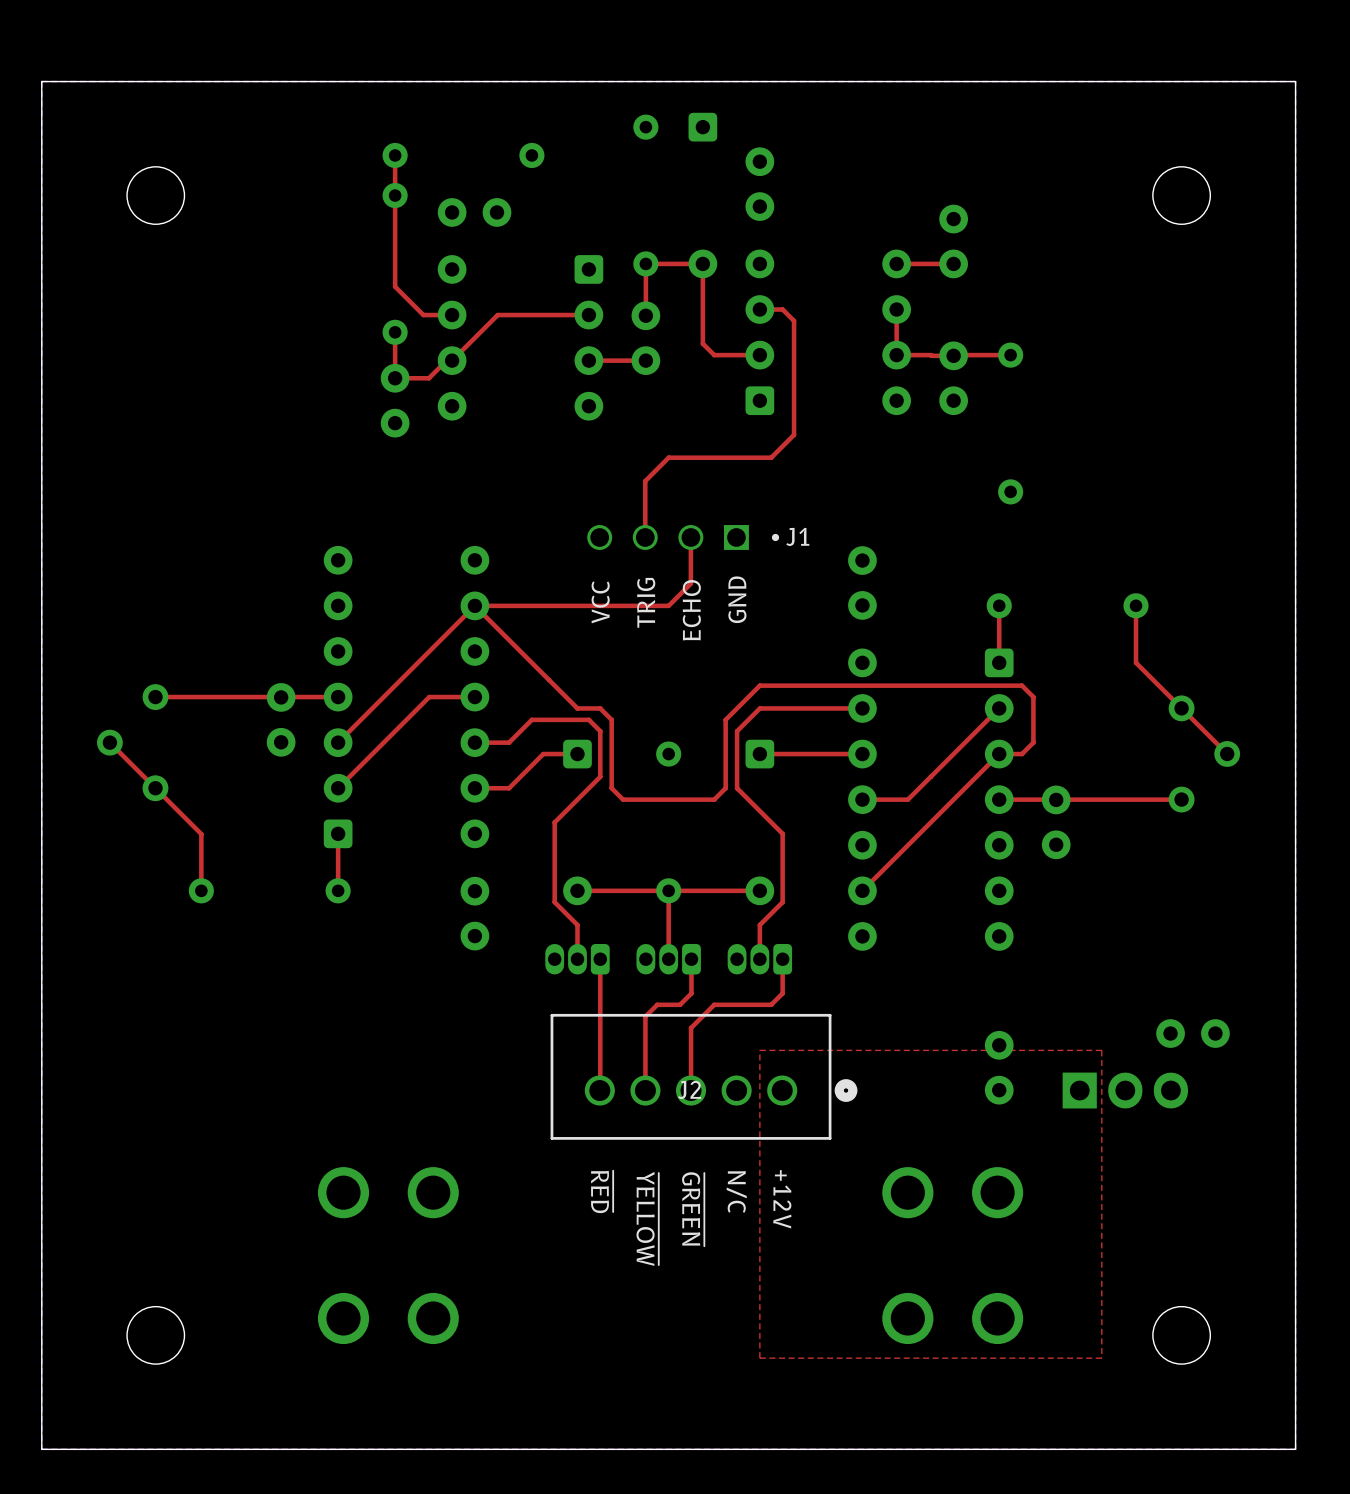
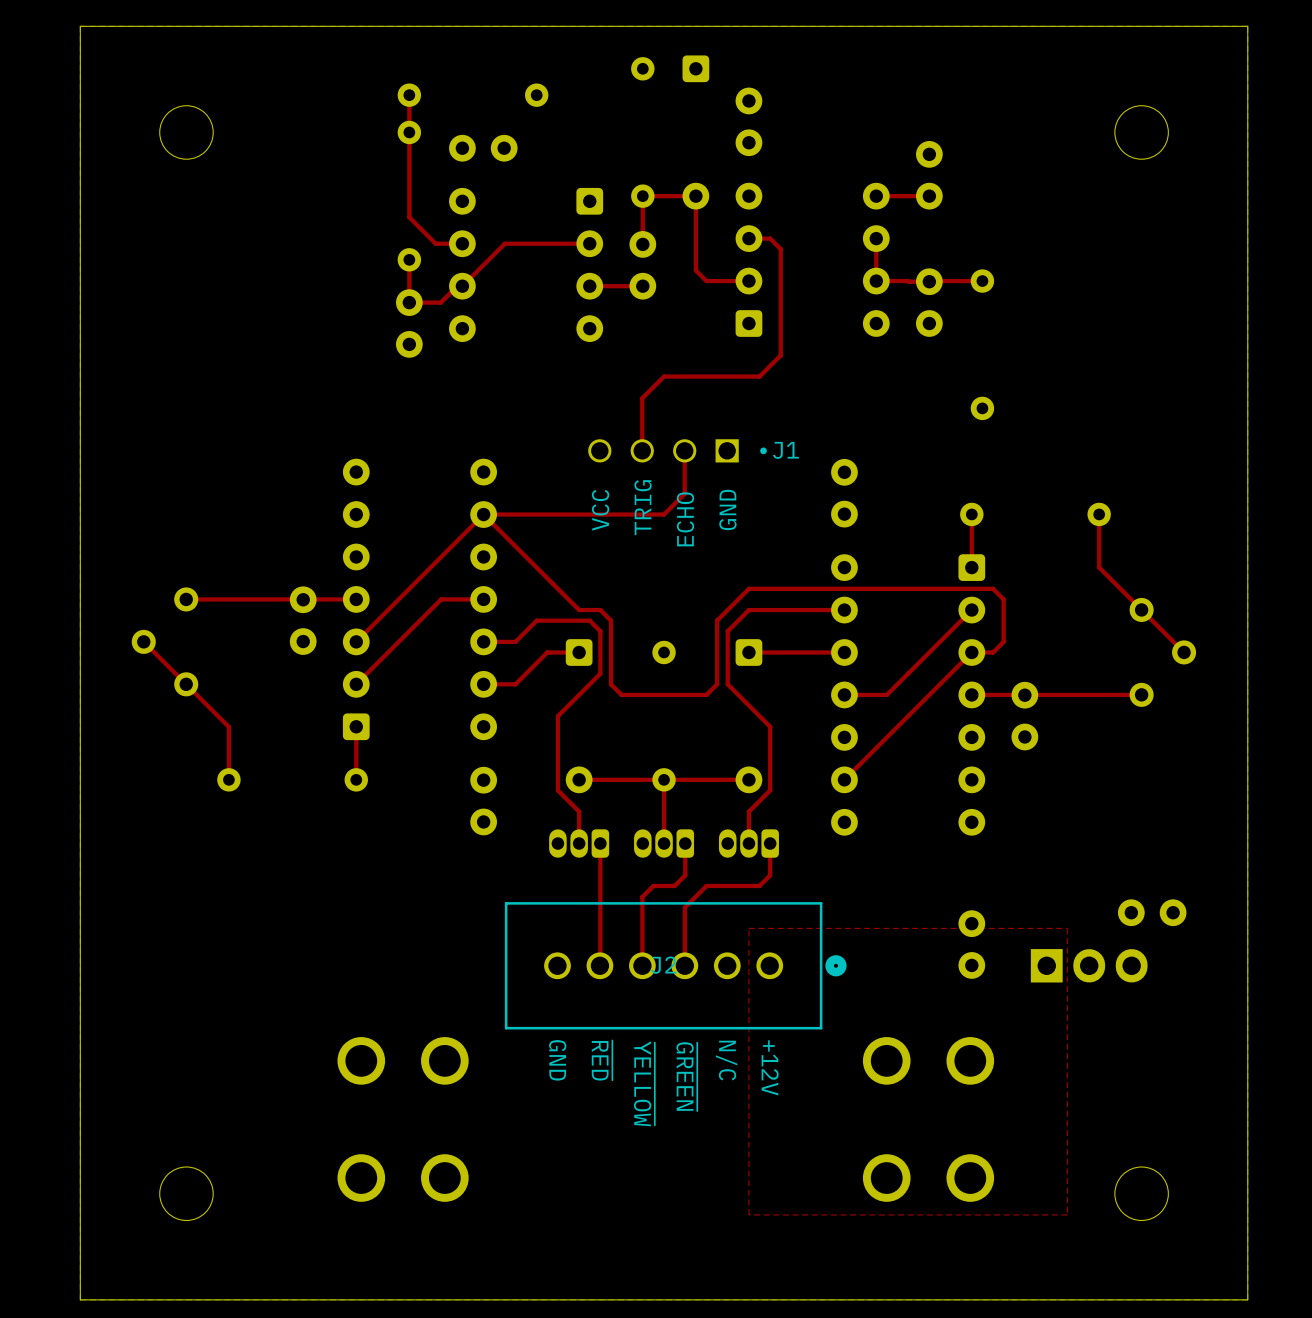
J2 footprint: [550, 1013, 858, 1140] -> [504, 902, 847, 1030]
text: none -> GND (557, 1060)

